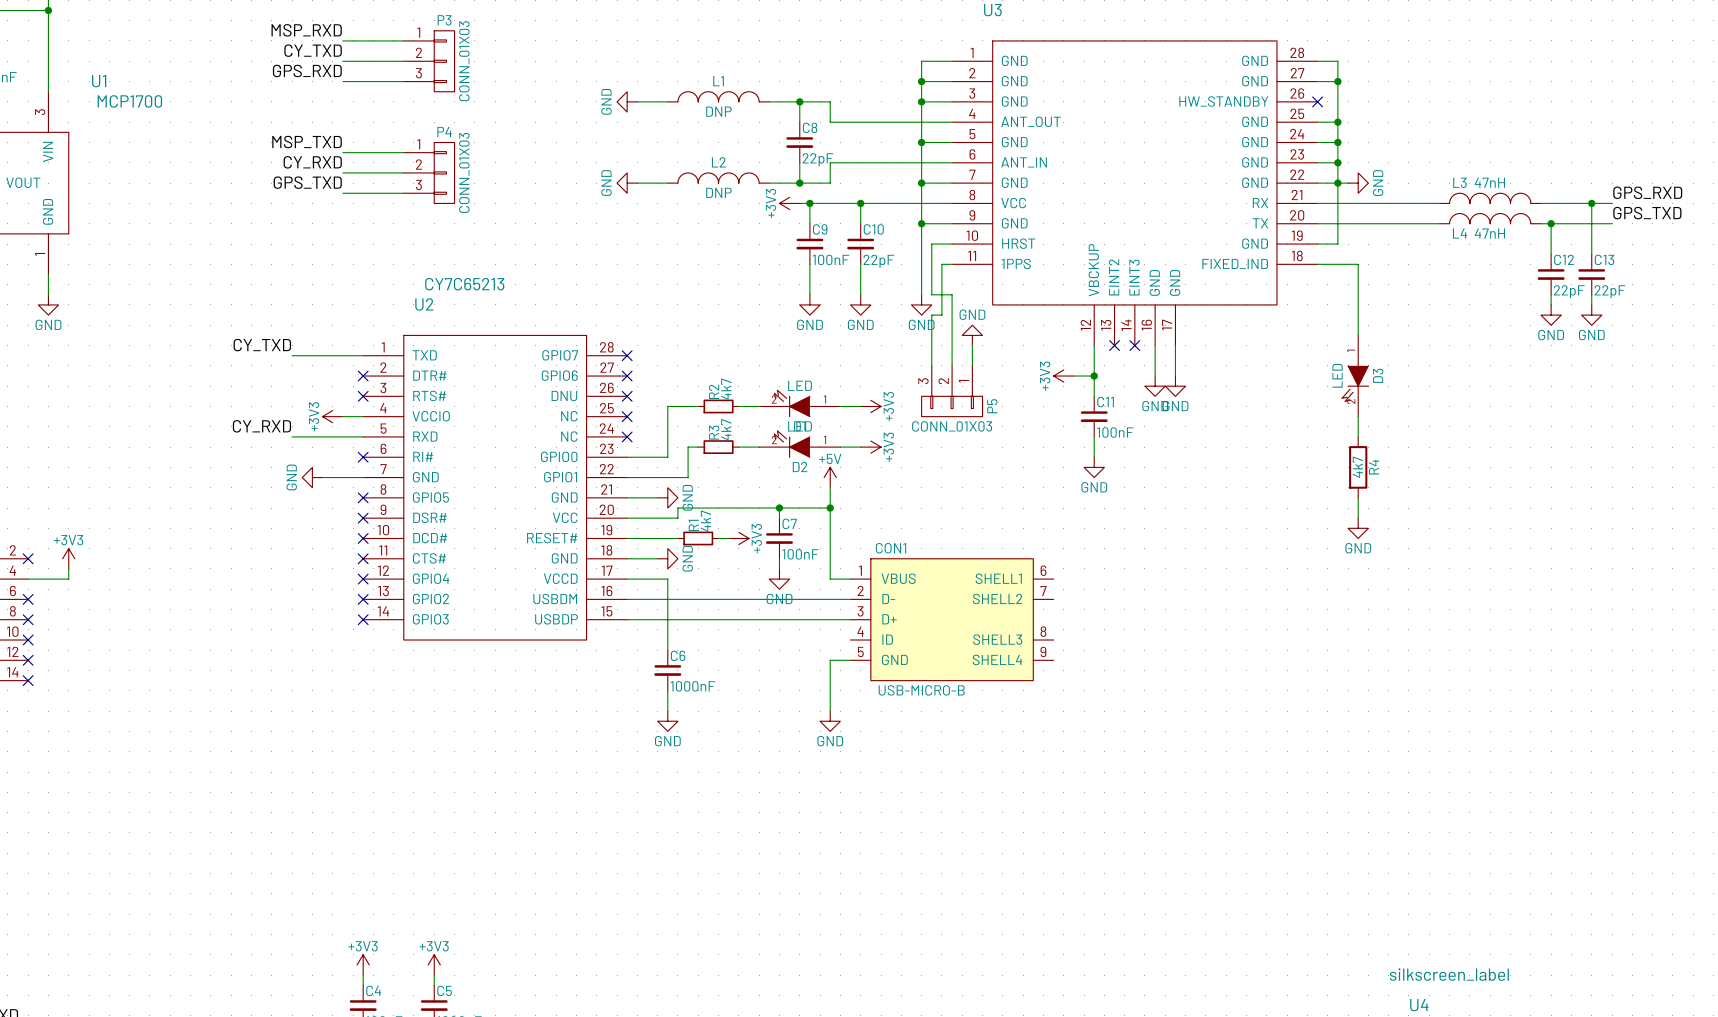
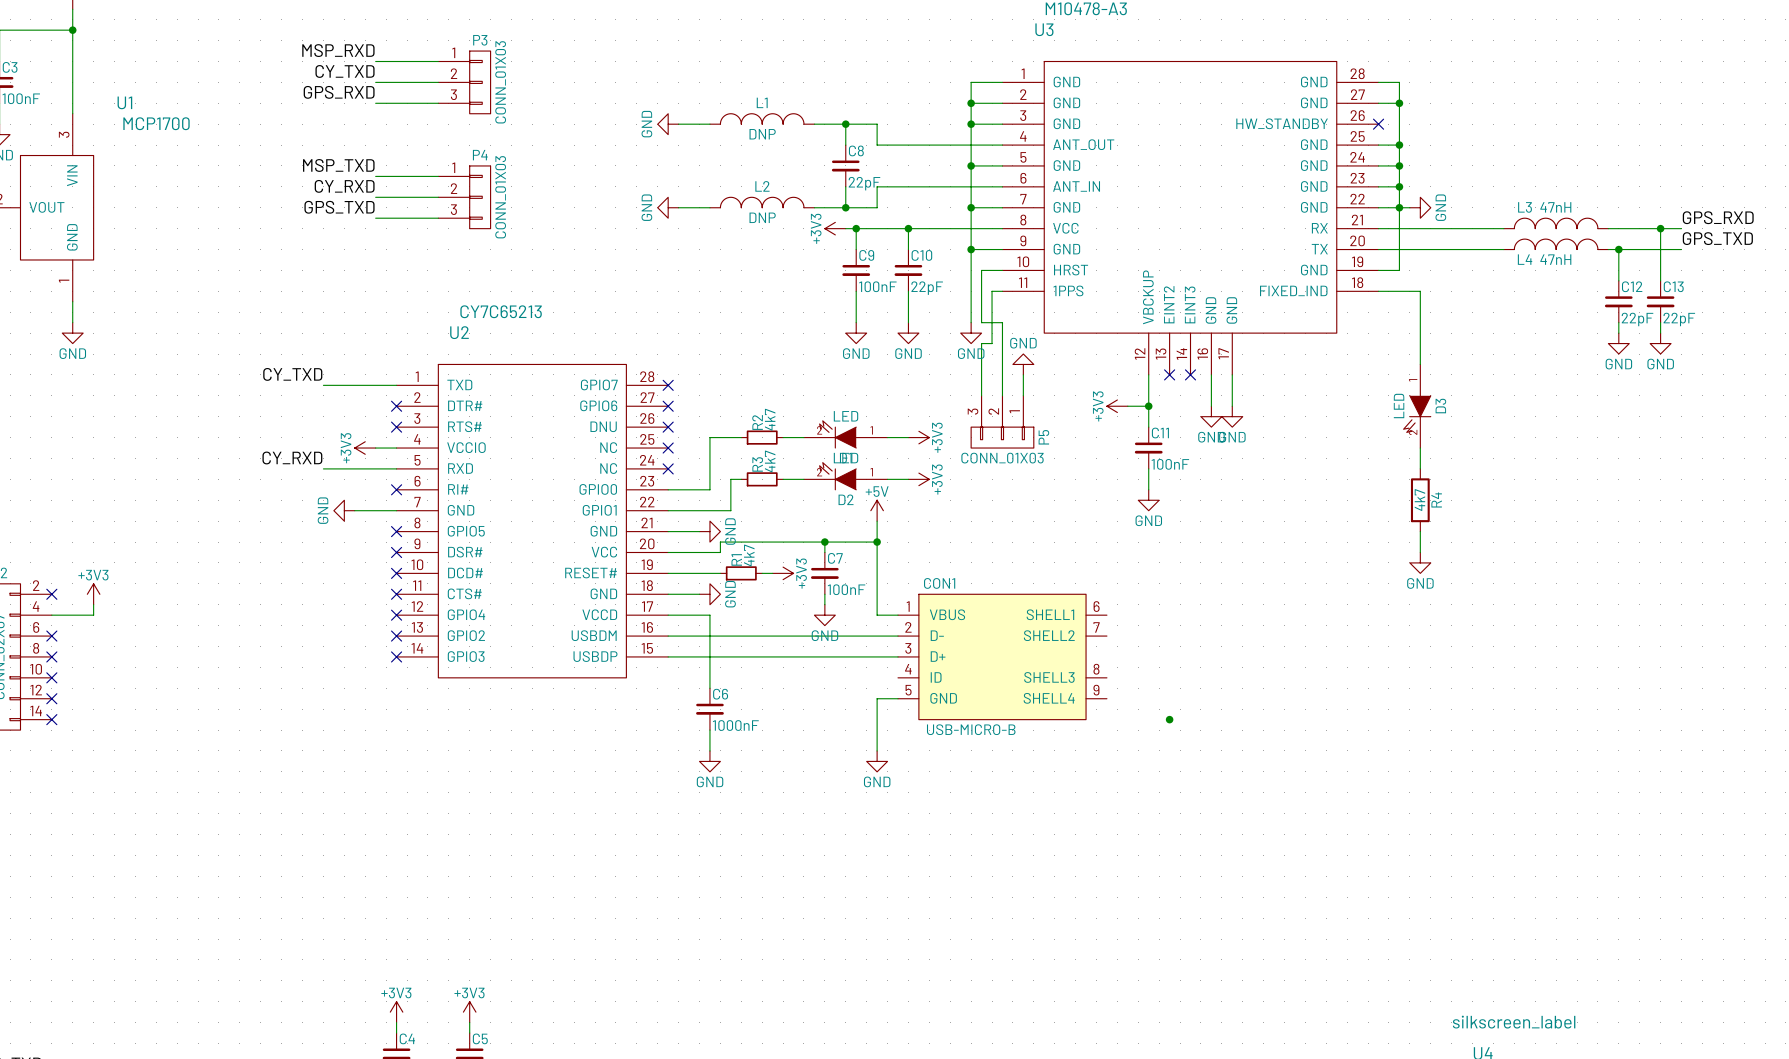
junction: none -> (1169, 719)

